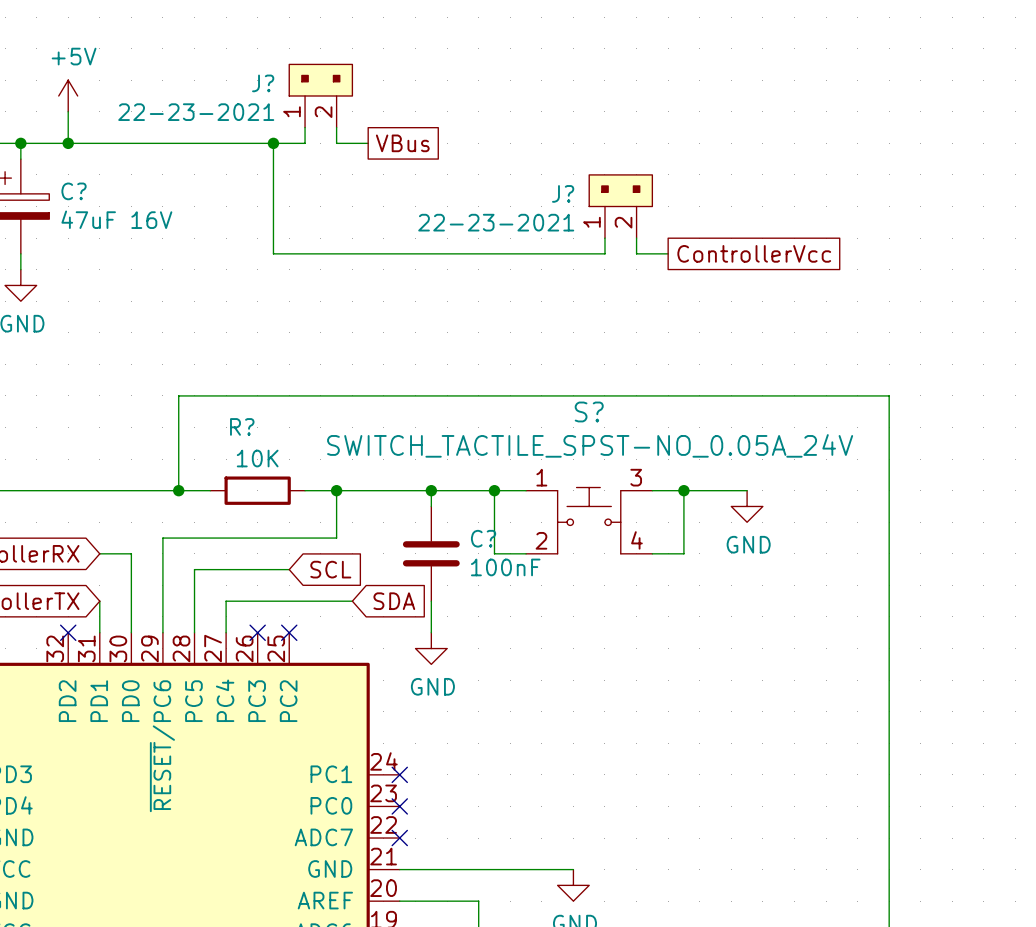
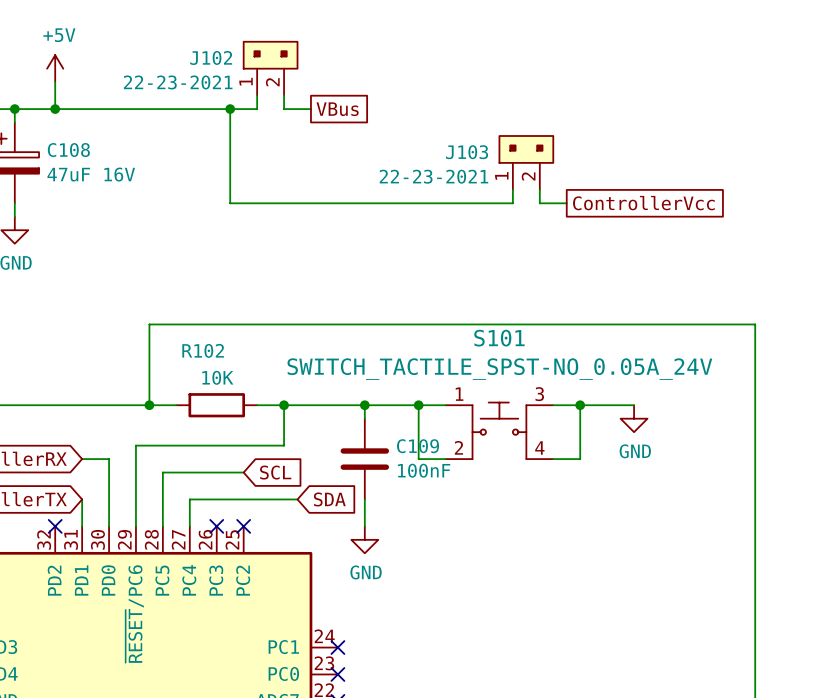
J? name: J? (263, 83) -> J102 (211, 57)
C? name: C? (74, 191) -> C108 (68, 150)
J? name: J? (563, 193) -> J103 (467, 152)
S? name: S? (589, 411) -> S101 (499, 338)
R? name: R? (242, 426) -> R102 (203, 350)
C? name: C? (483, 538) -> C109 (418, 446)

